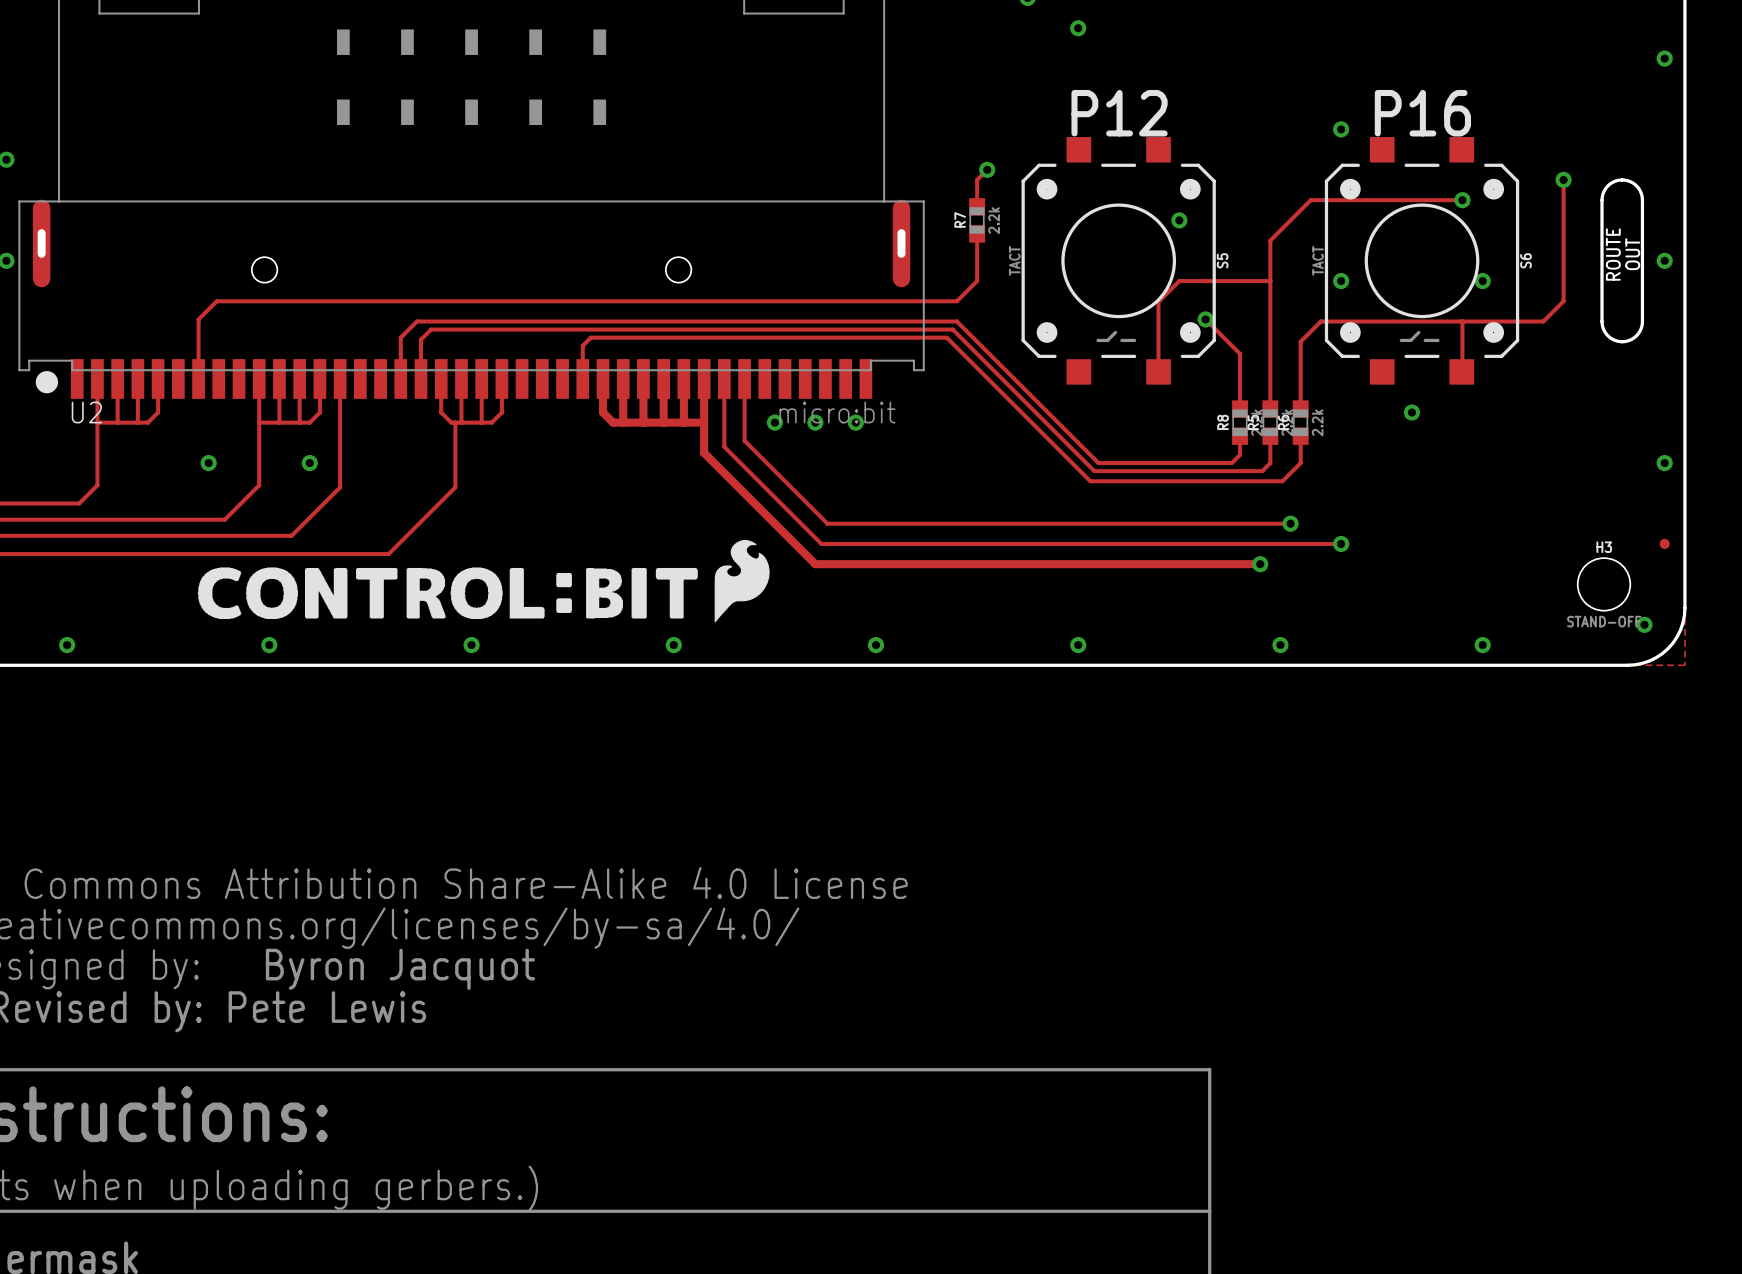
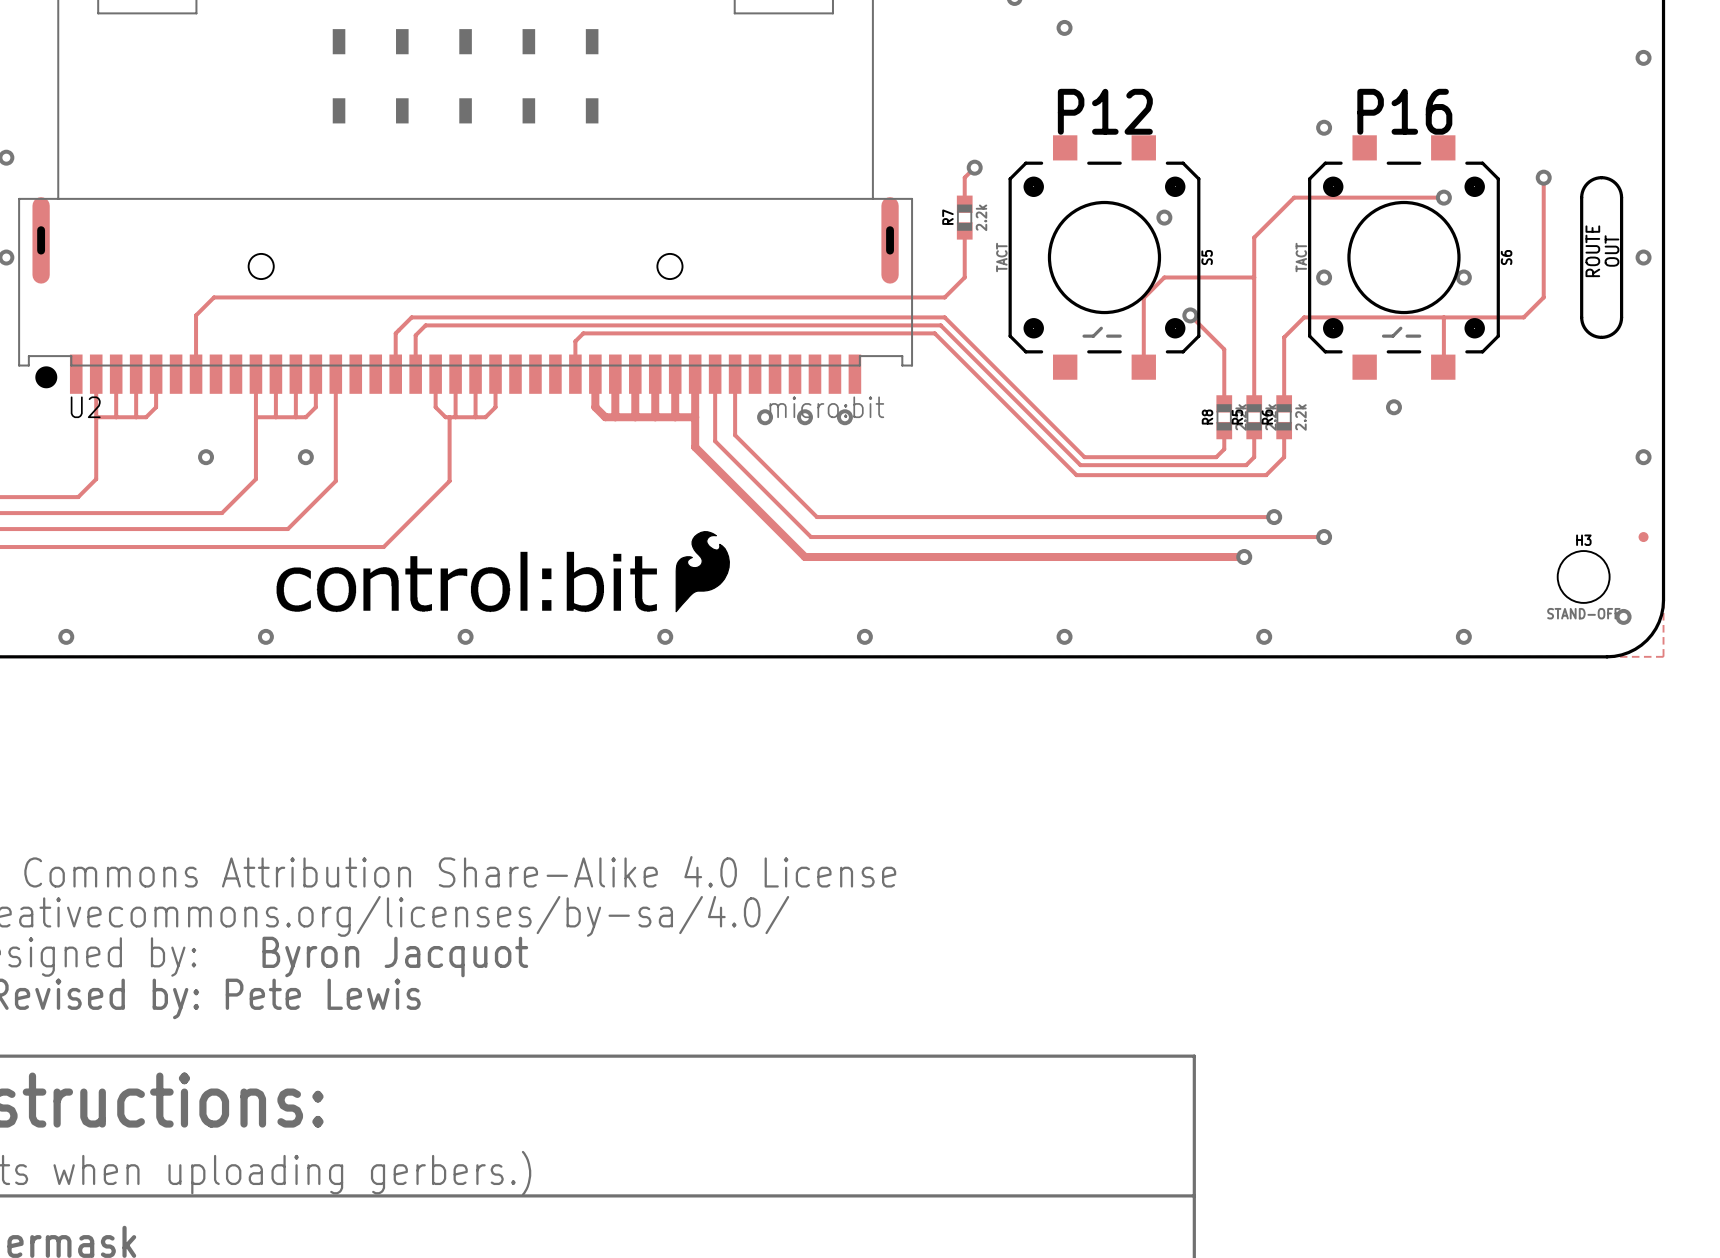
drawing: none -> [276, 551, 657, 613]
drawing: [197, 567, 698, 620] -> none
drawing position: (742, 581) -> (702, 571)

